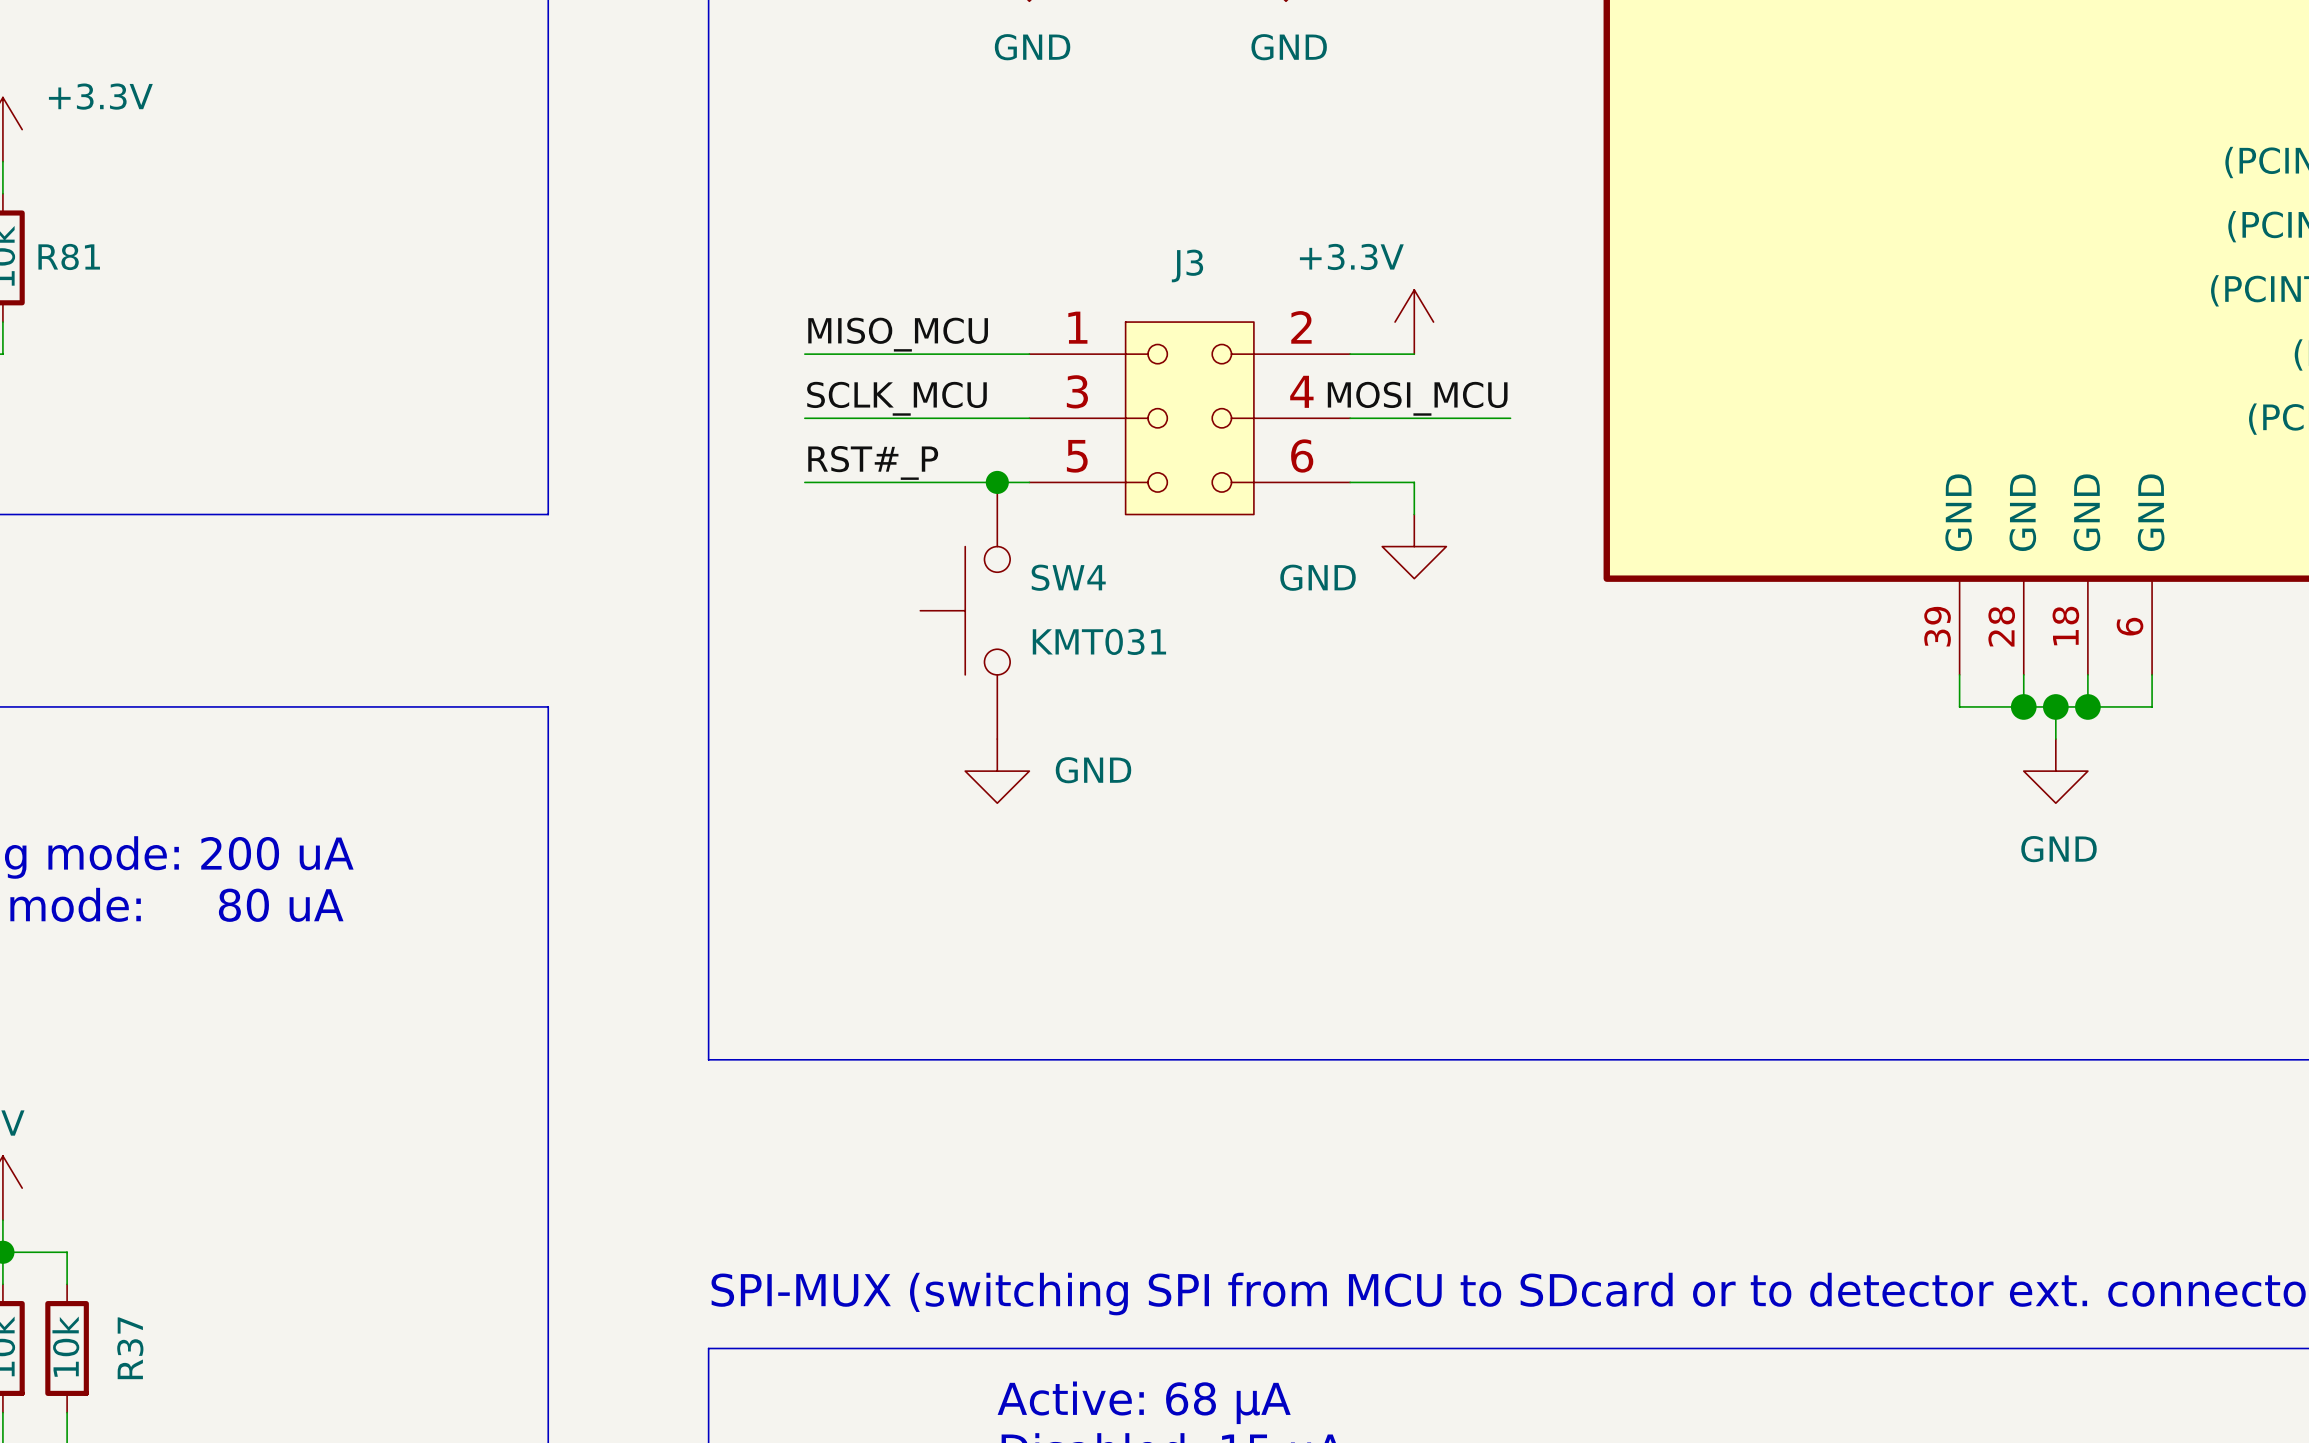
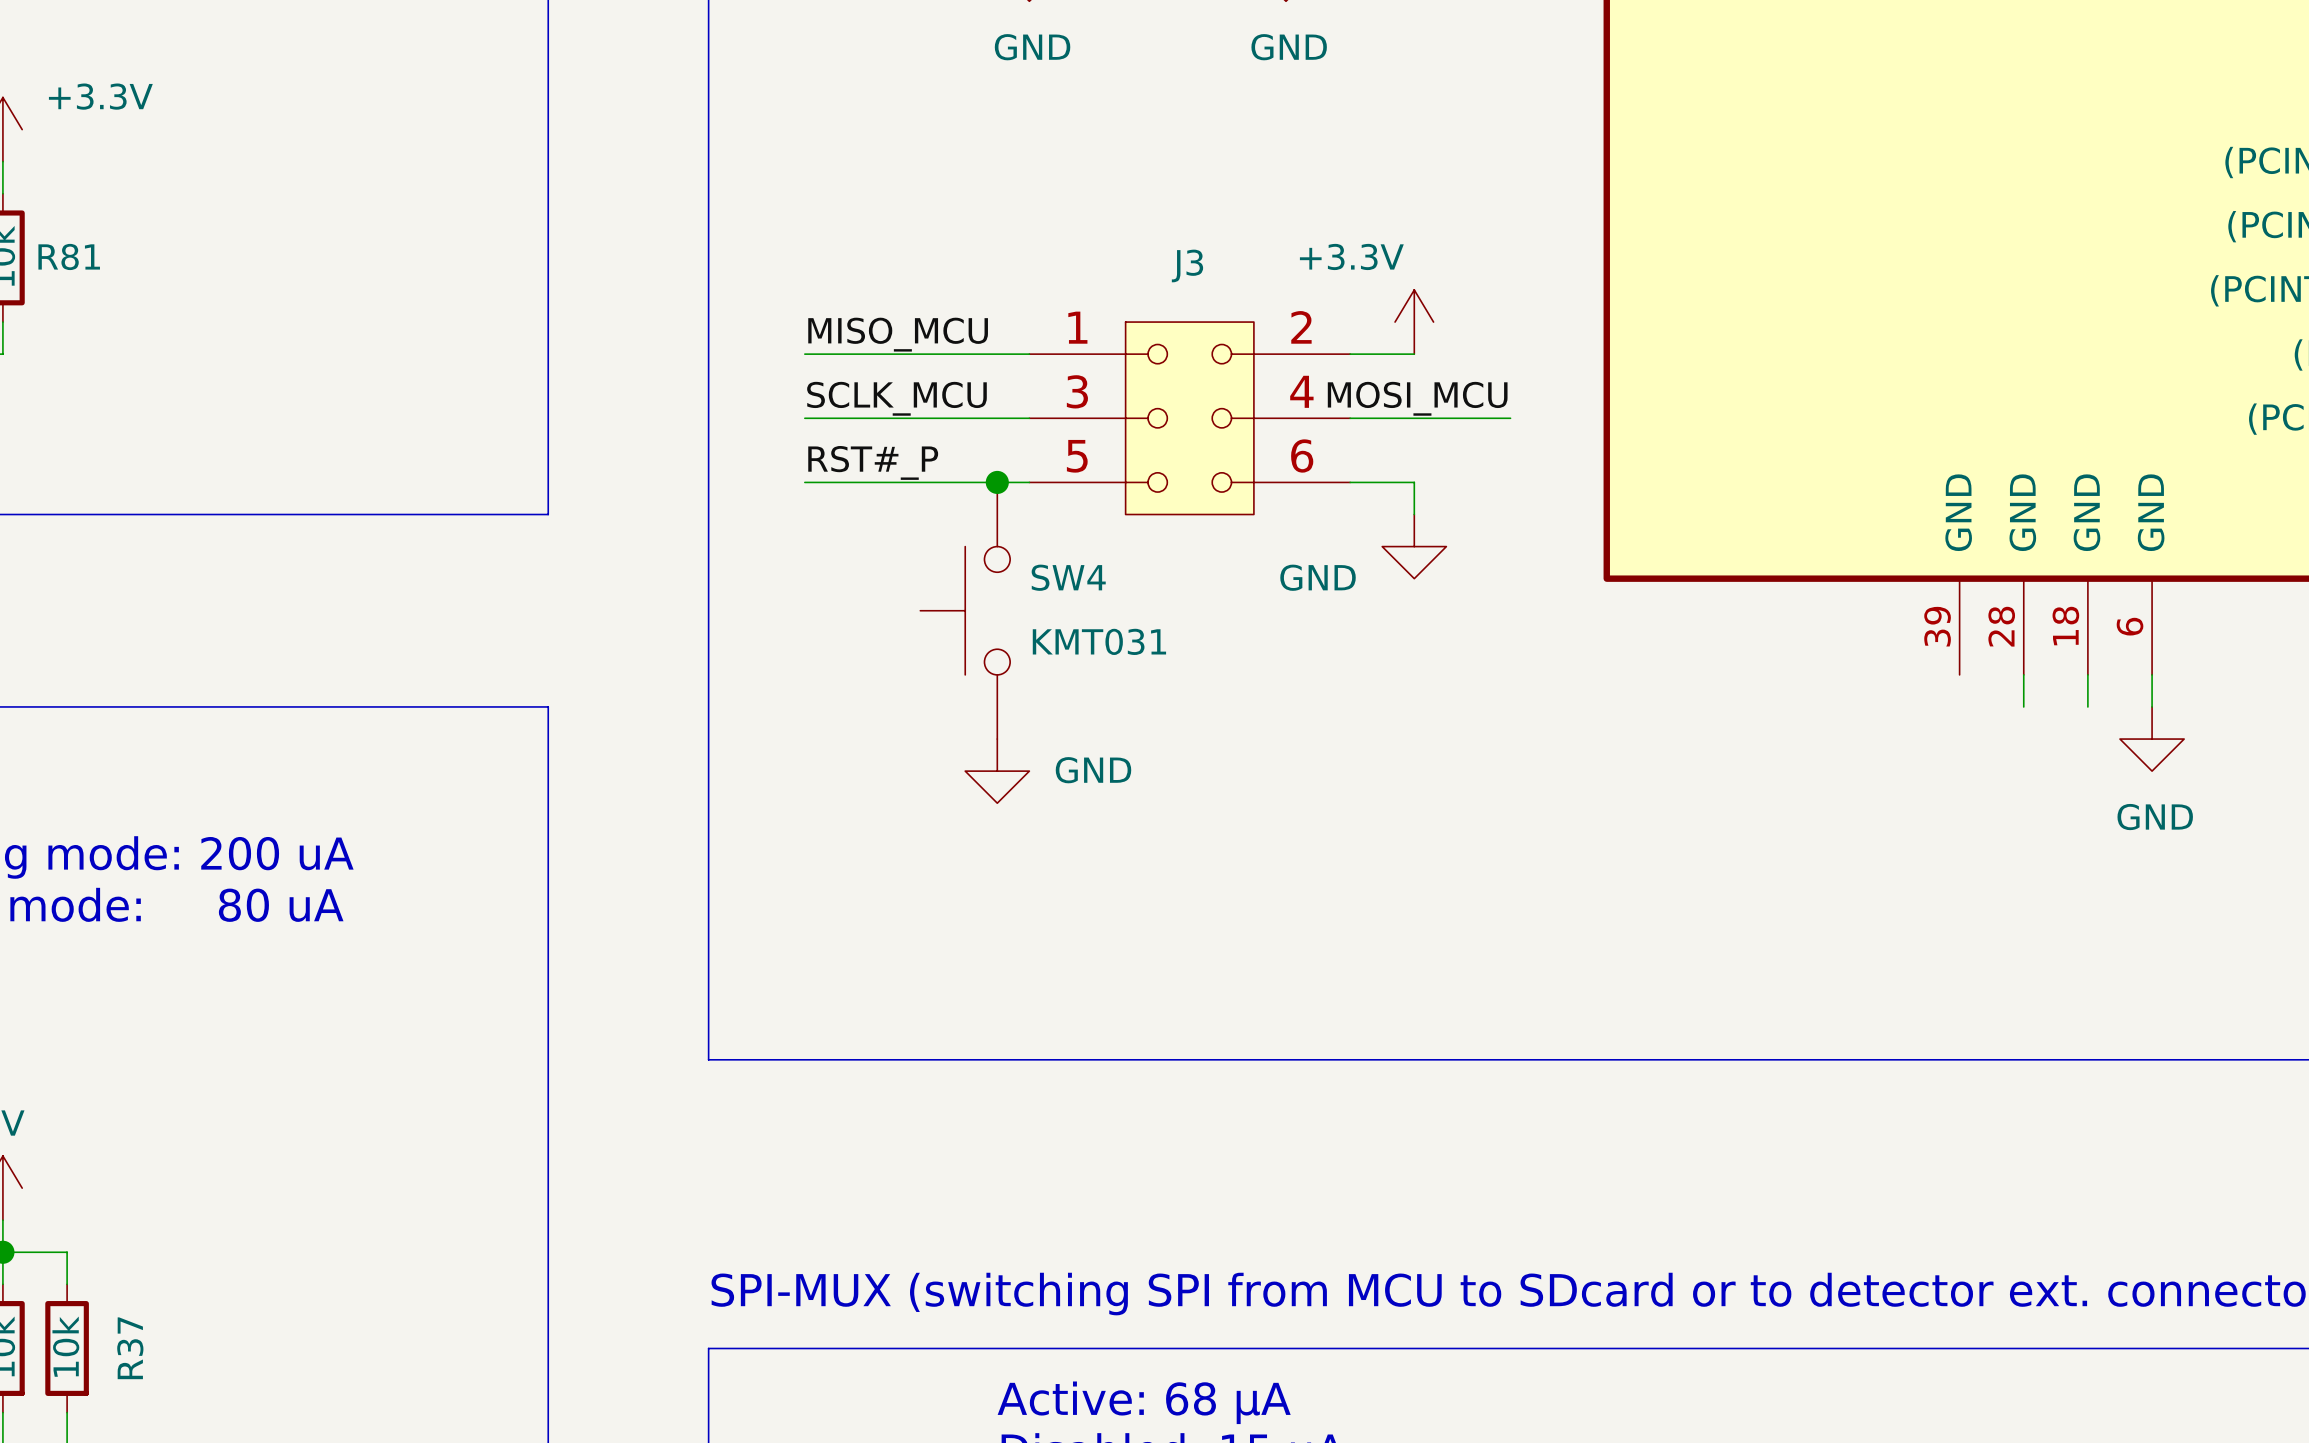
wire: (1959, 674) (1959, 706) (2152, 706) -> none
junction: (2023, 706) -> none
wire: (2055, 706) (2055, 739) -> none
junction: (2055, 706) -> none
junction: (2087, 706) -> none
power symbol position: GND (2055, 771) -> GND (2152, 739)

